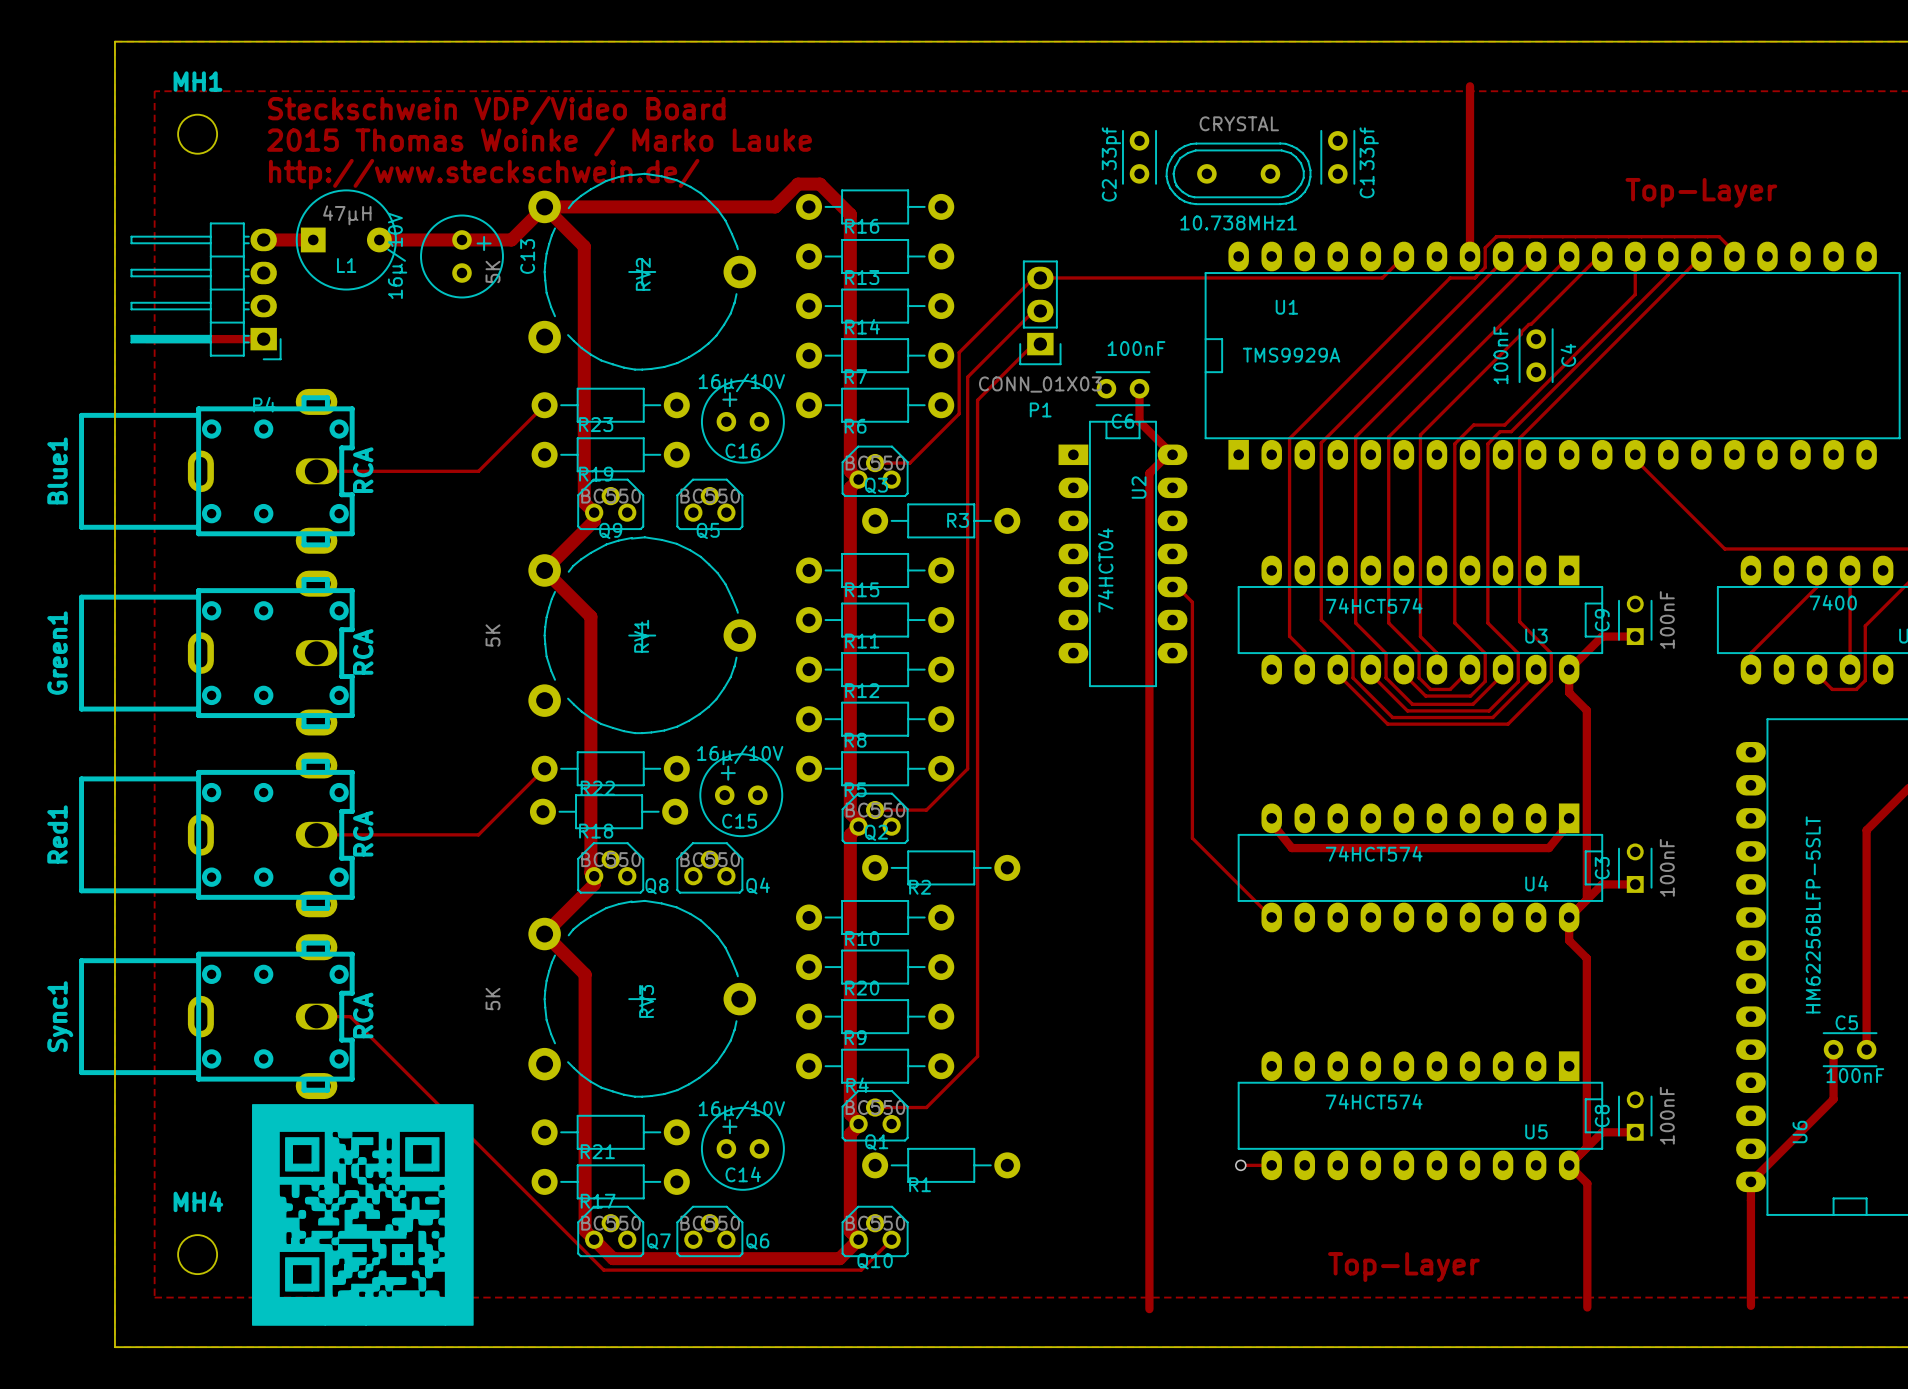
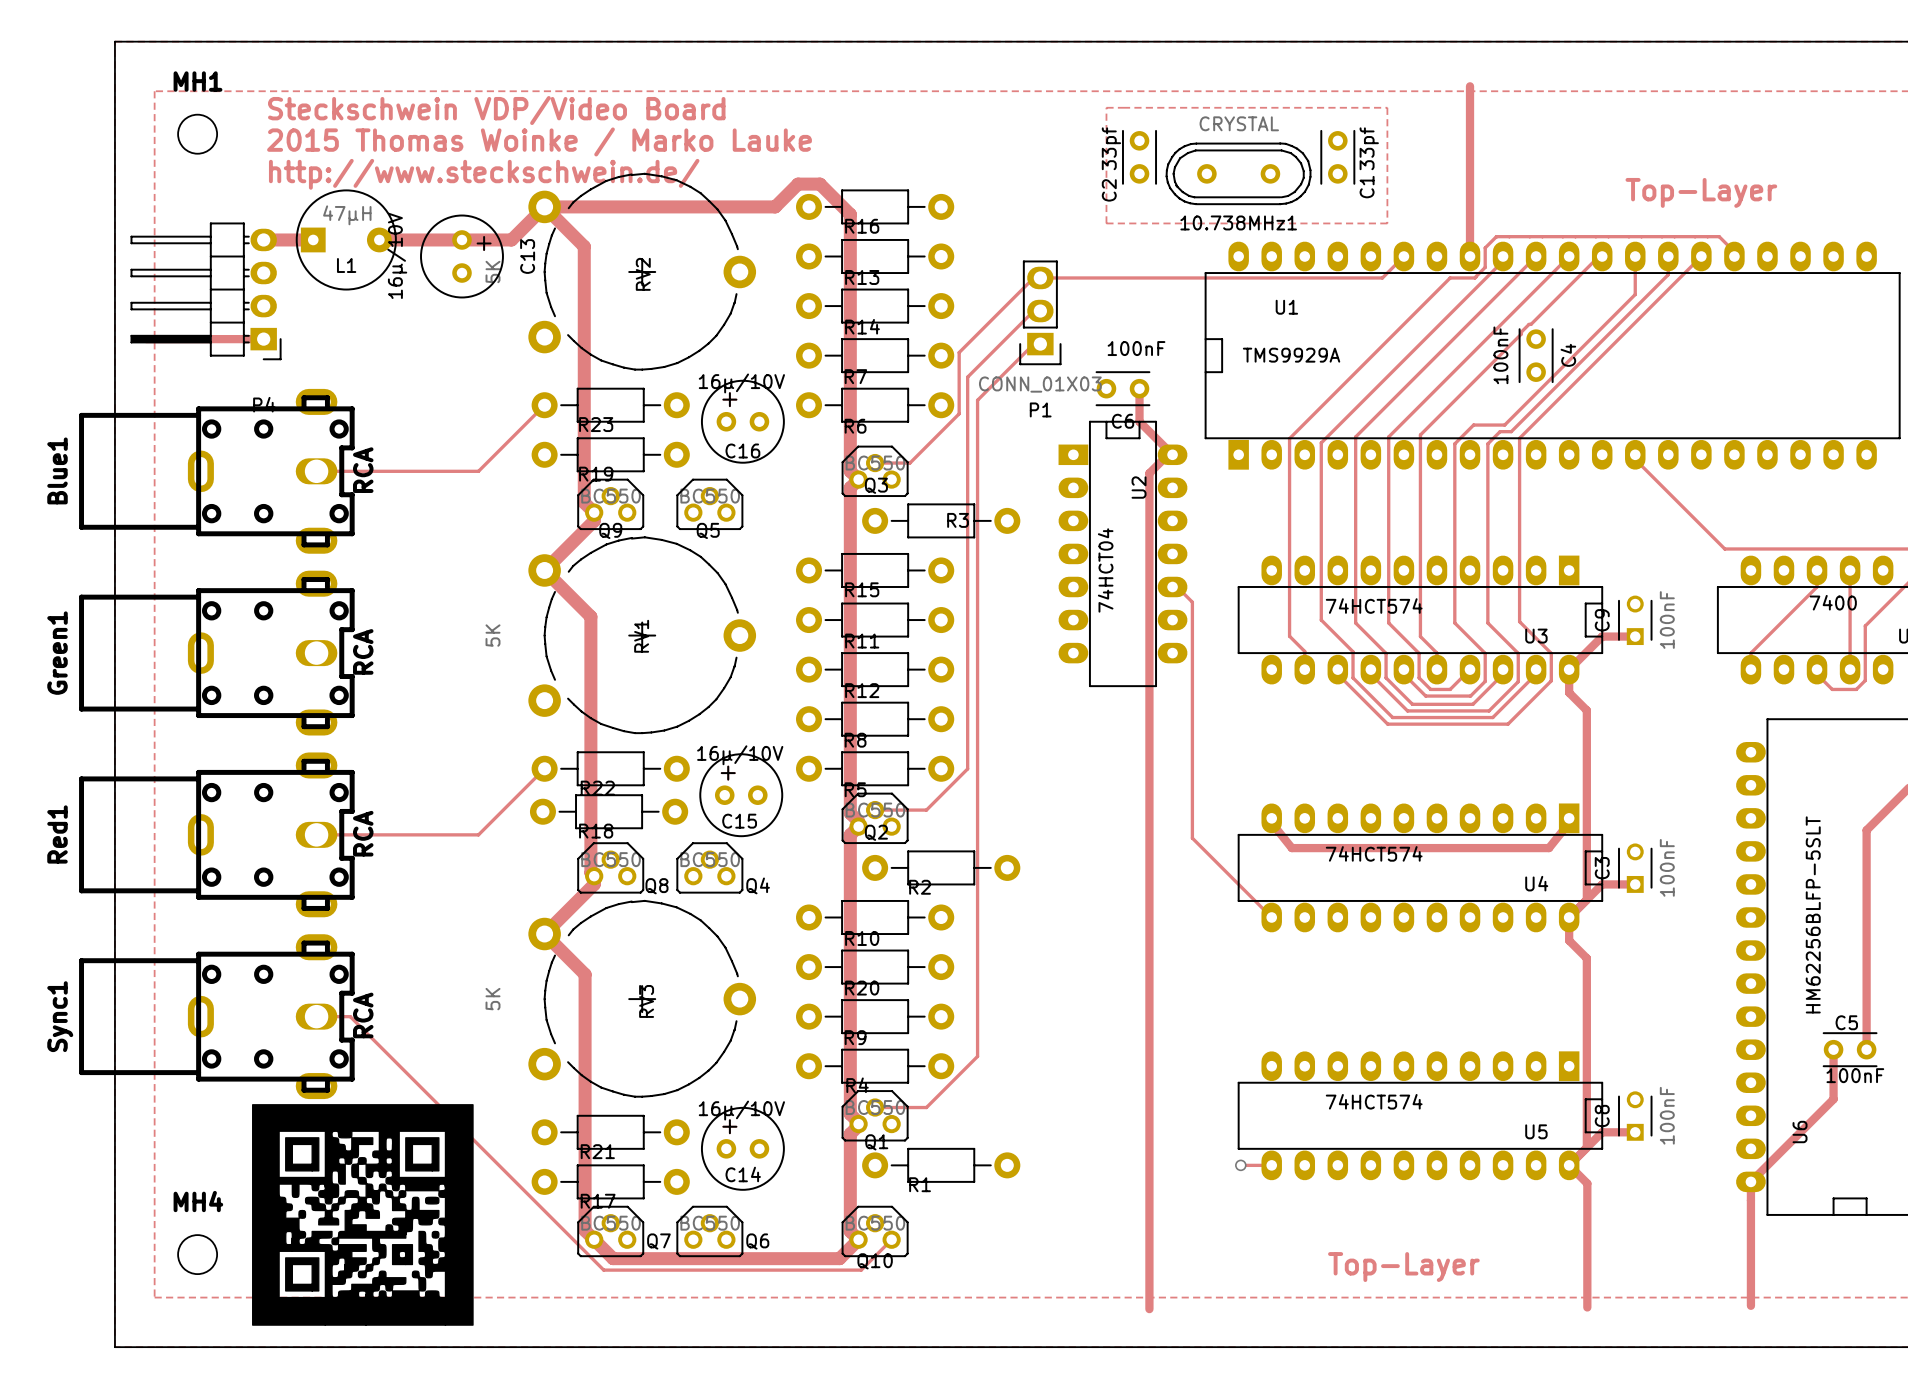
zone outline: none -> (1106, 107) (1387, 107) (1387, 223) (1106, 223) (1106, 107)

